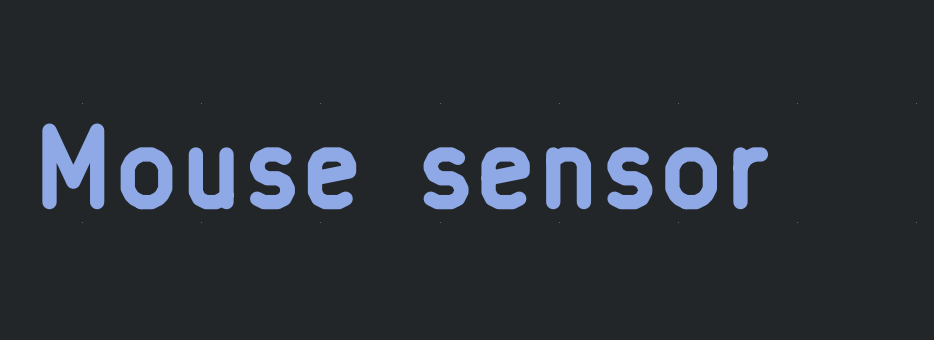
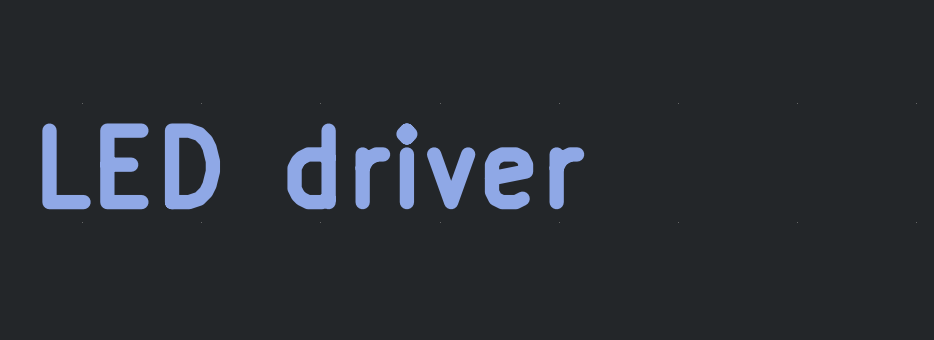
text: Mouse sensor (405, 166) -> LED driver (313, 166)

